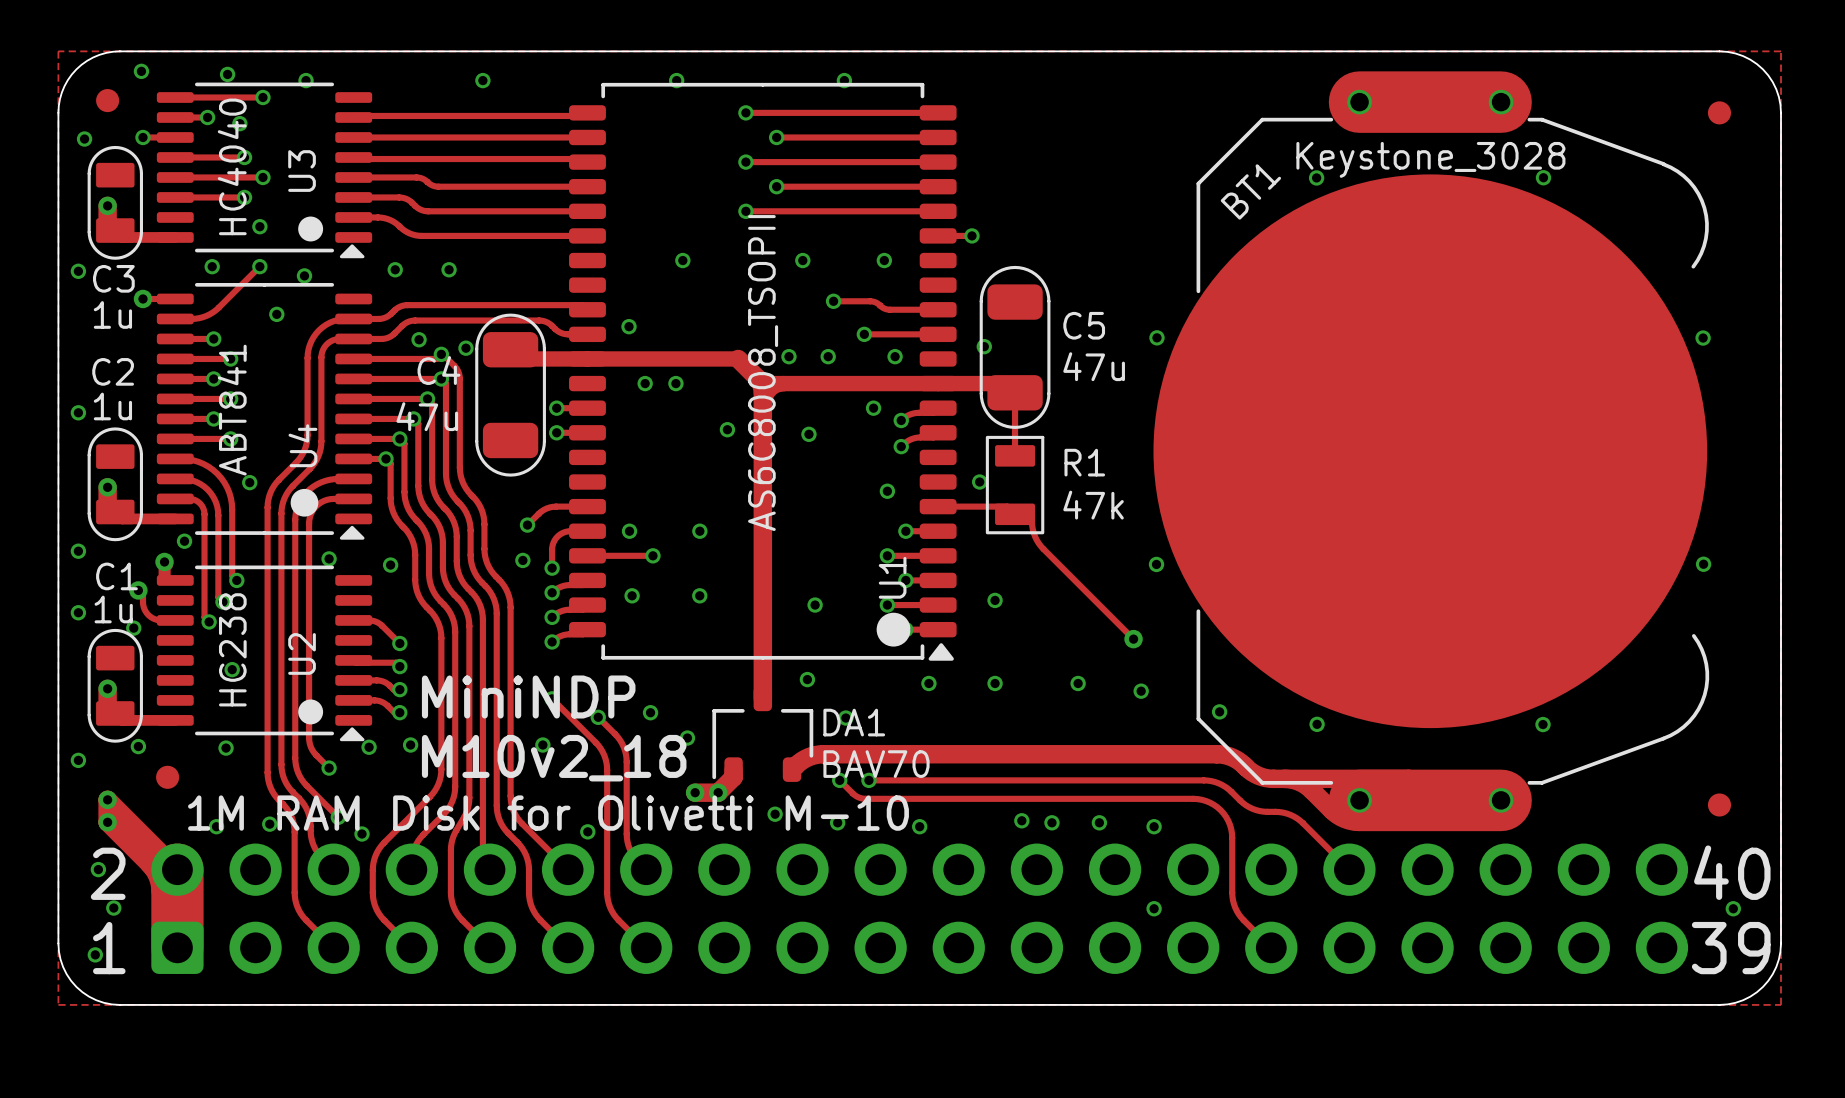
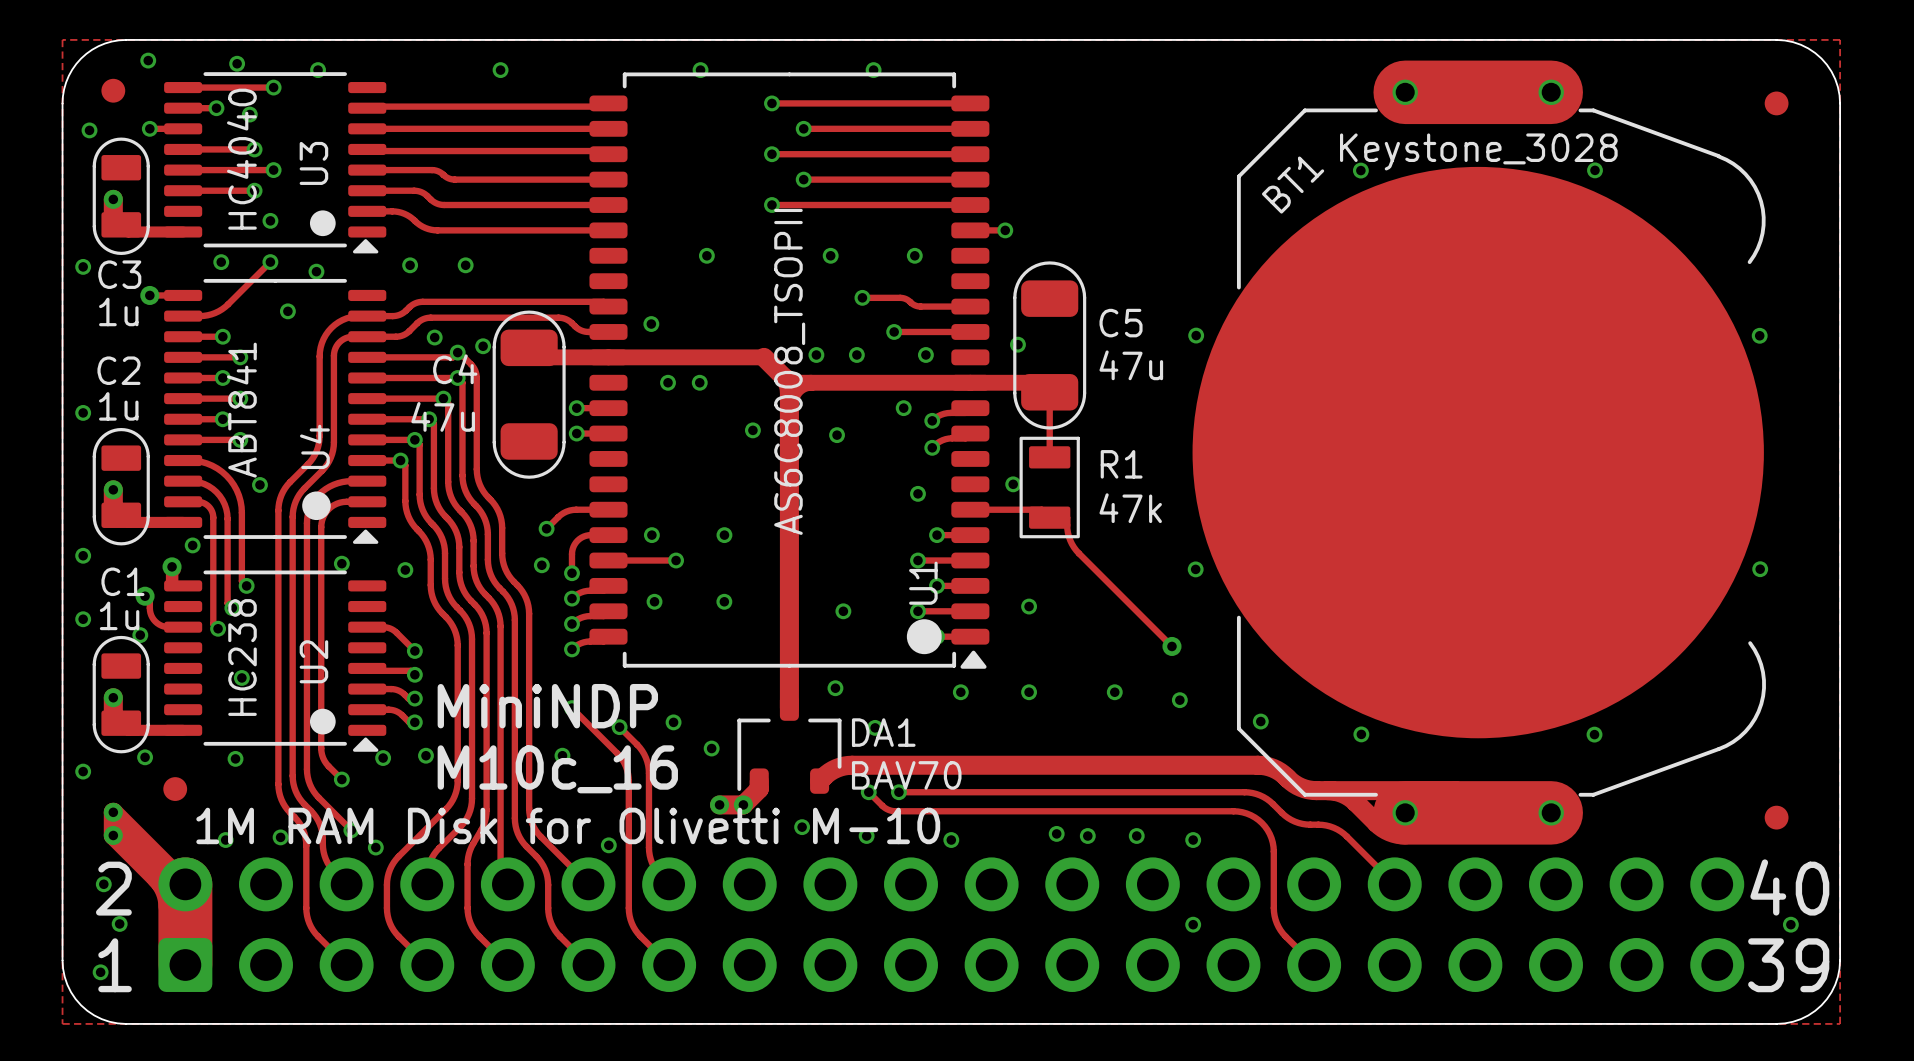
text: M10v2_18 (554, 758) -> M10c_16 (557, 769)

